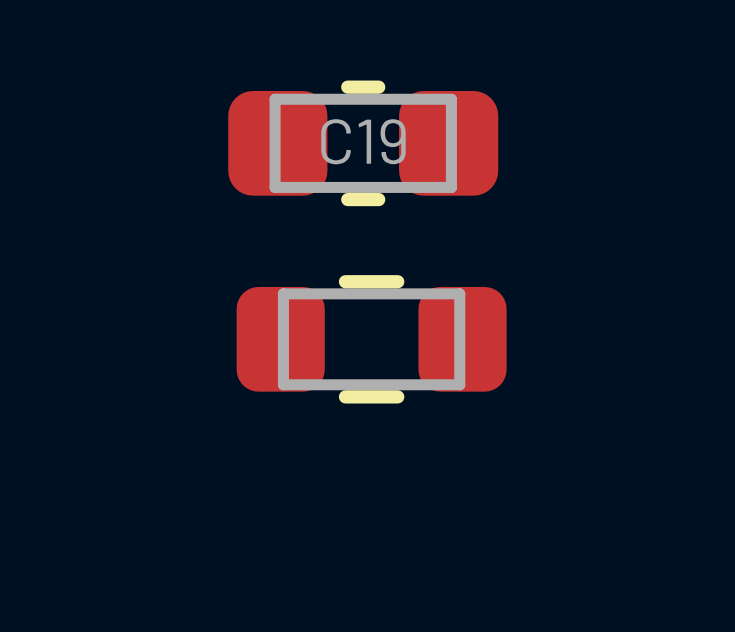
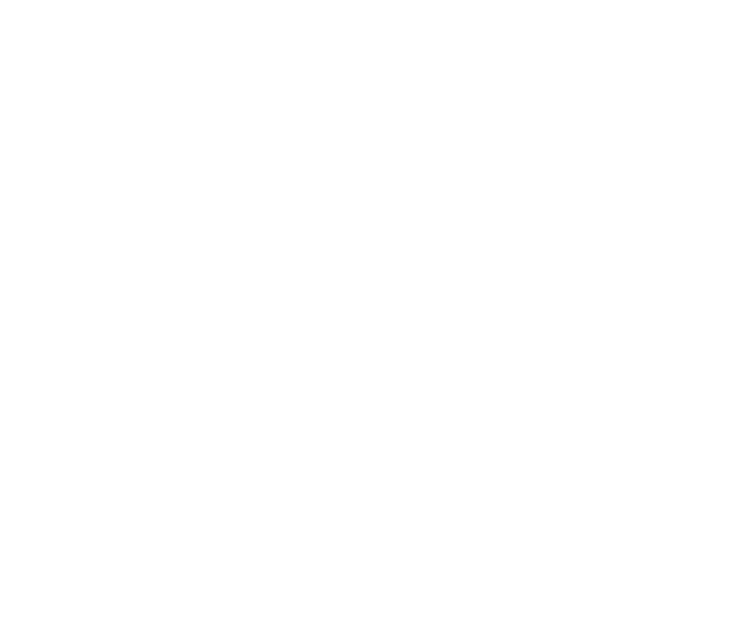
C19: (363, 143) -> none
part: (371, 339) -> none

